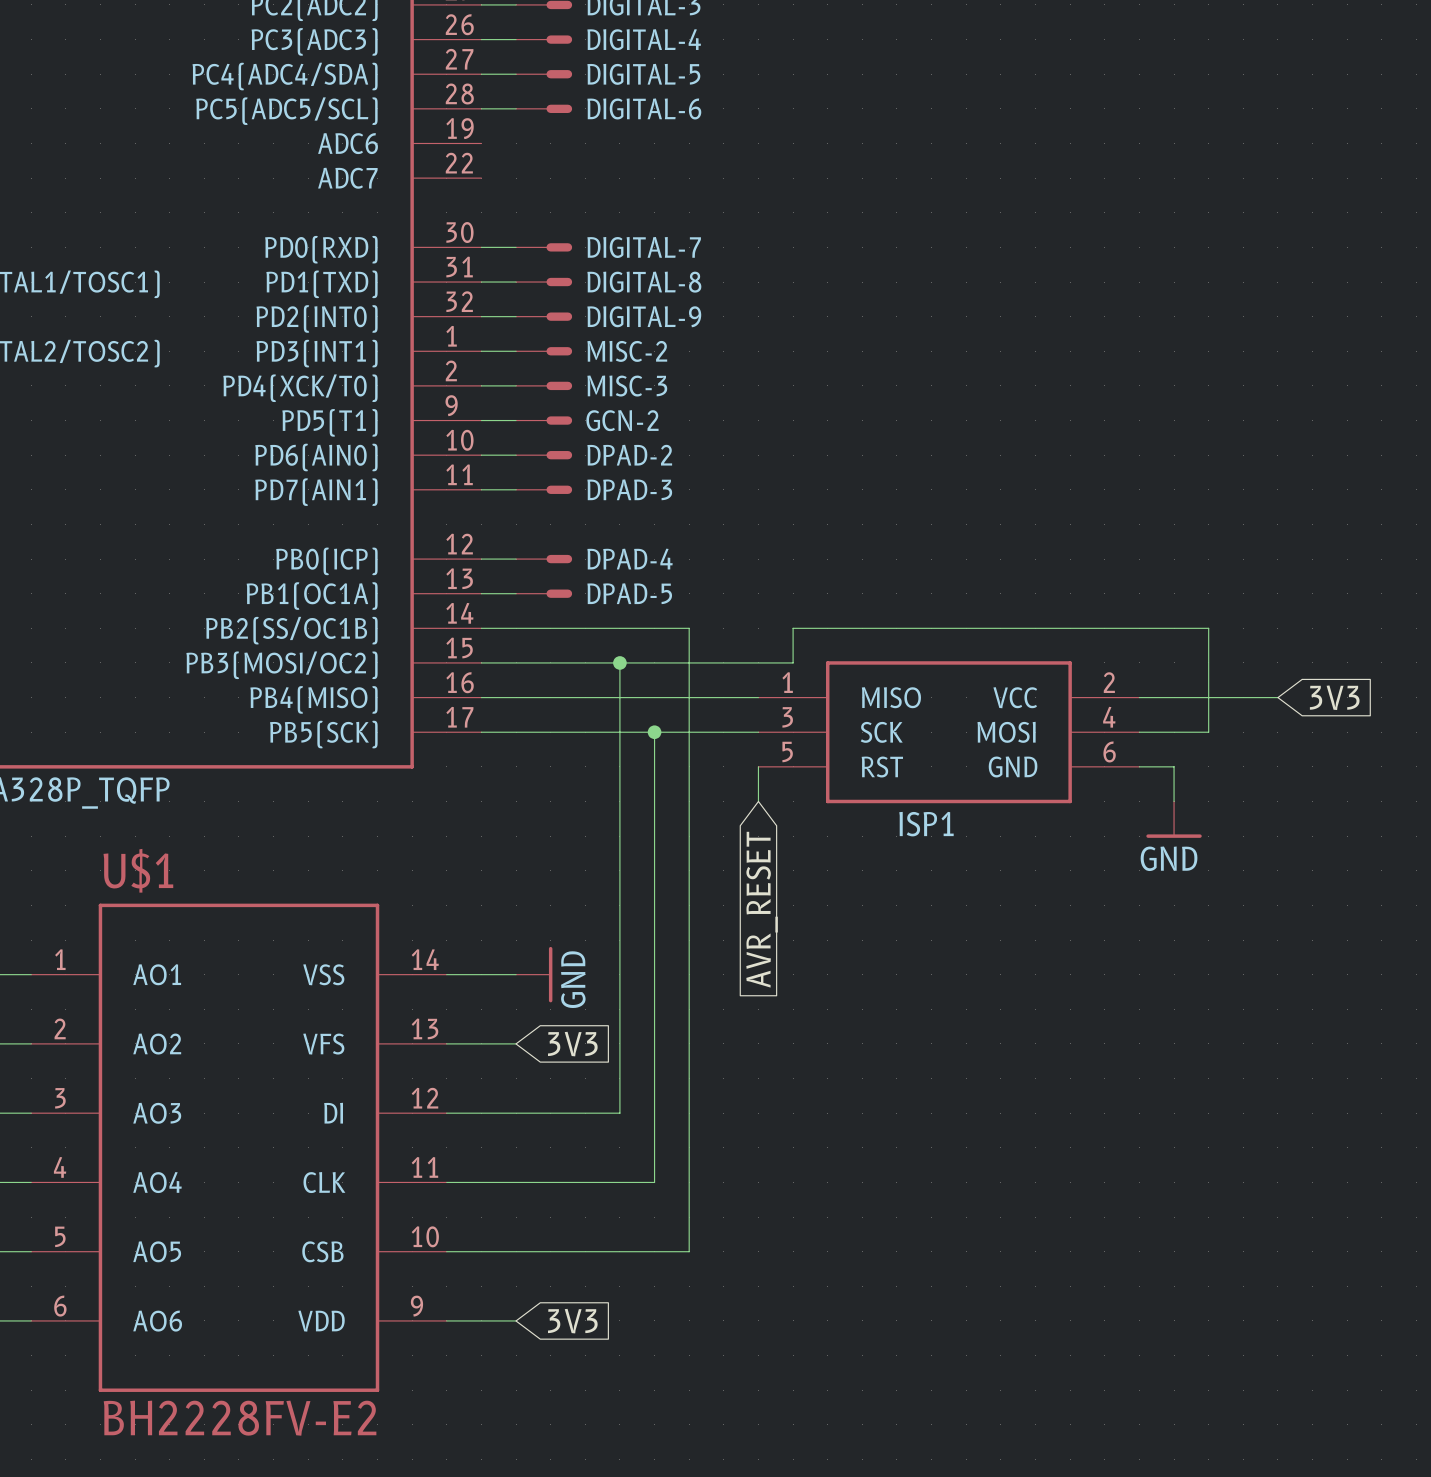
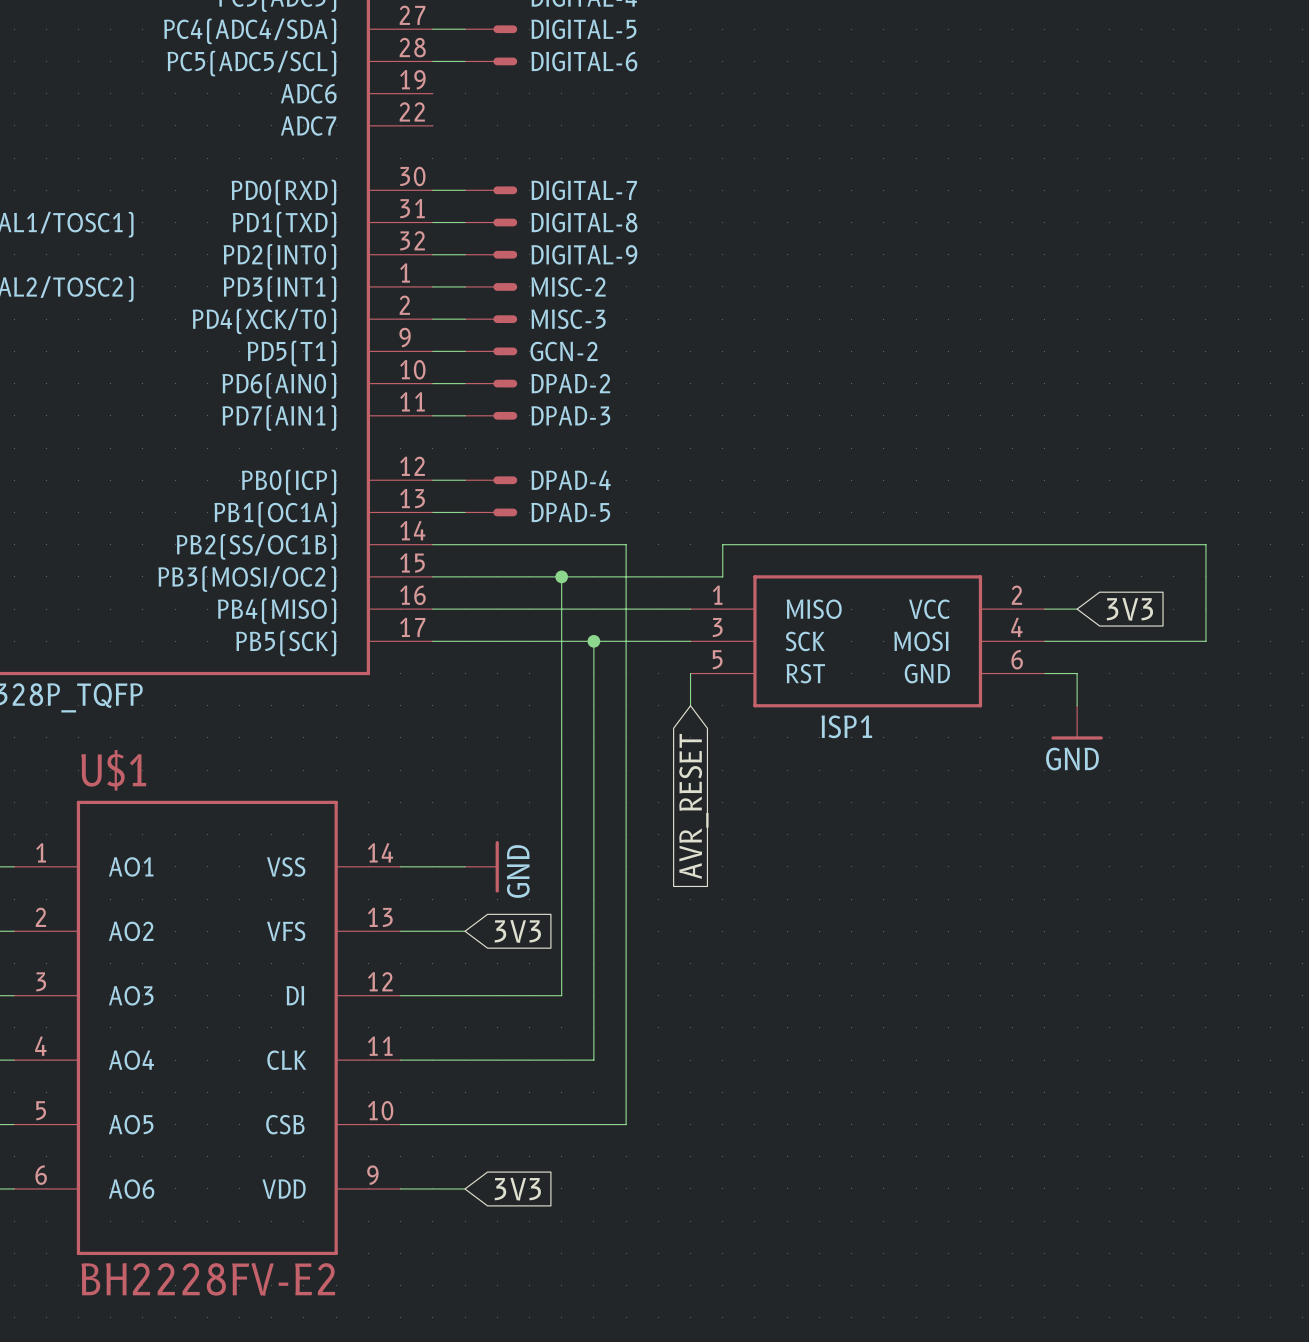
wire: (1208, 628) (1208, 732) -> (1109, 544) (1205, 544) (1205, 641) (1109, 641)
wire: (1174, 697) (1277, 697) -> none
global label position: 3V3 (1334, 697) -> 3V3 (1129, 609)

